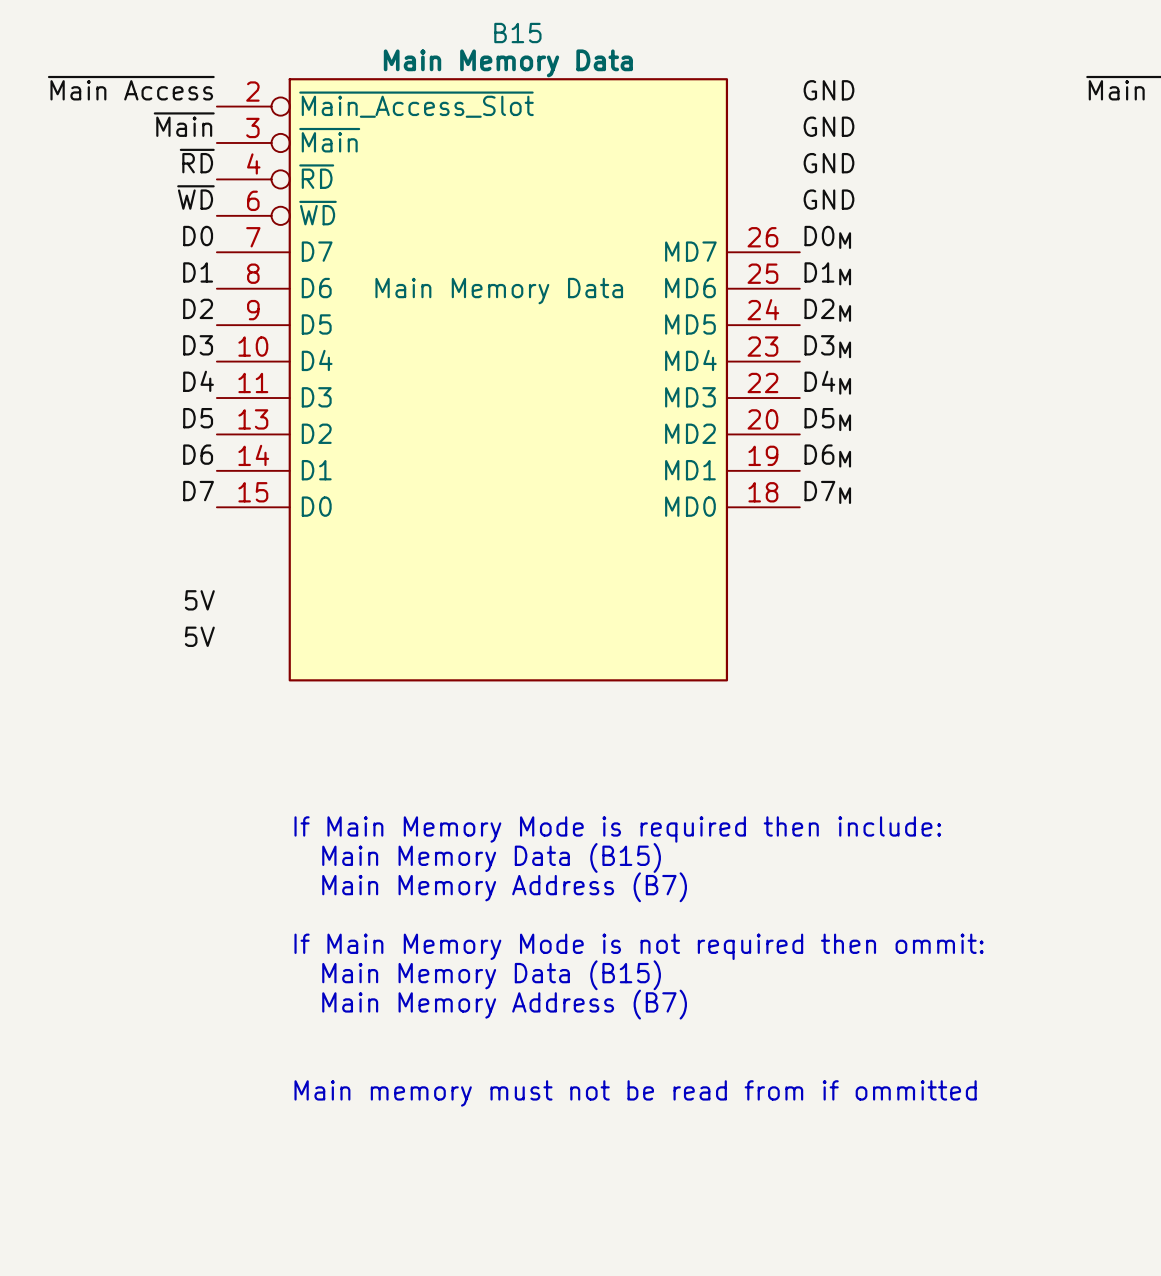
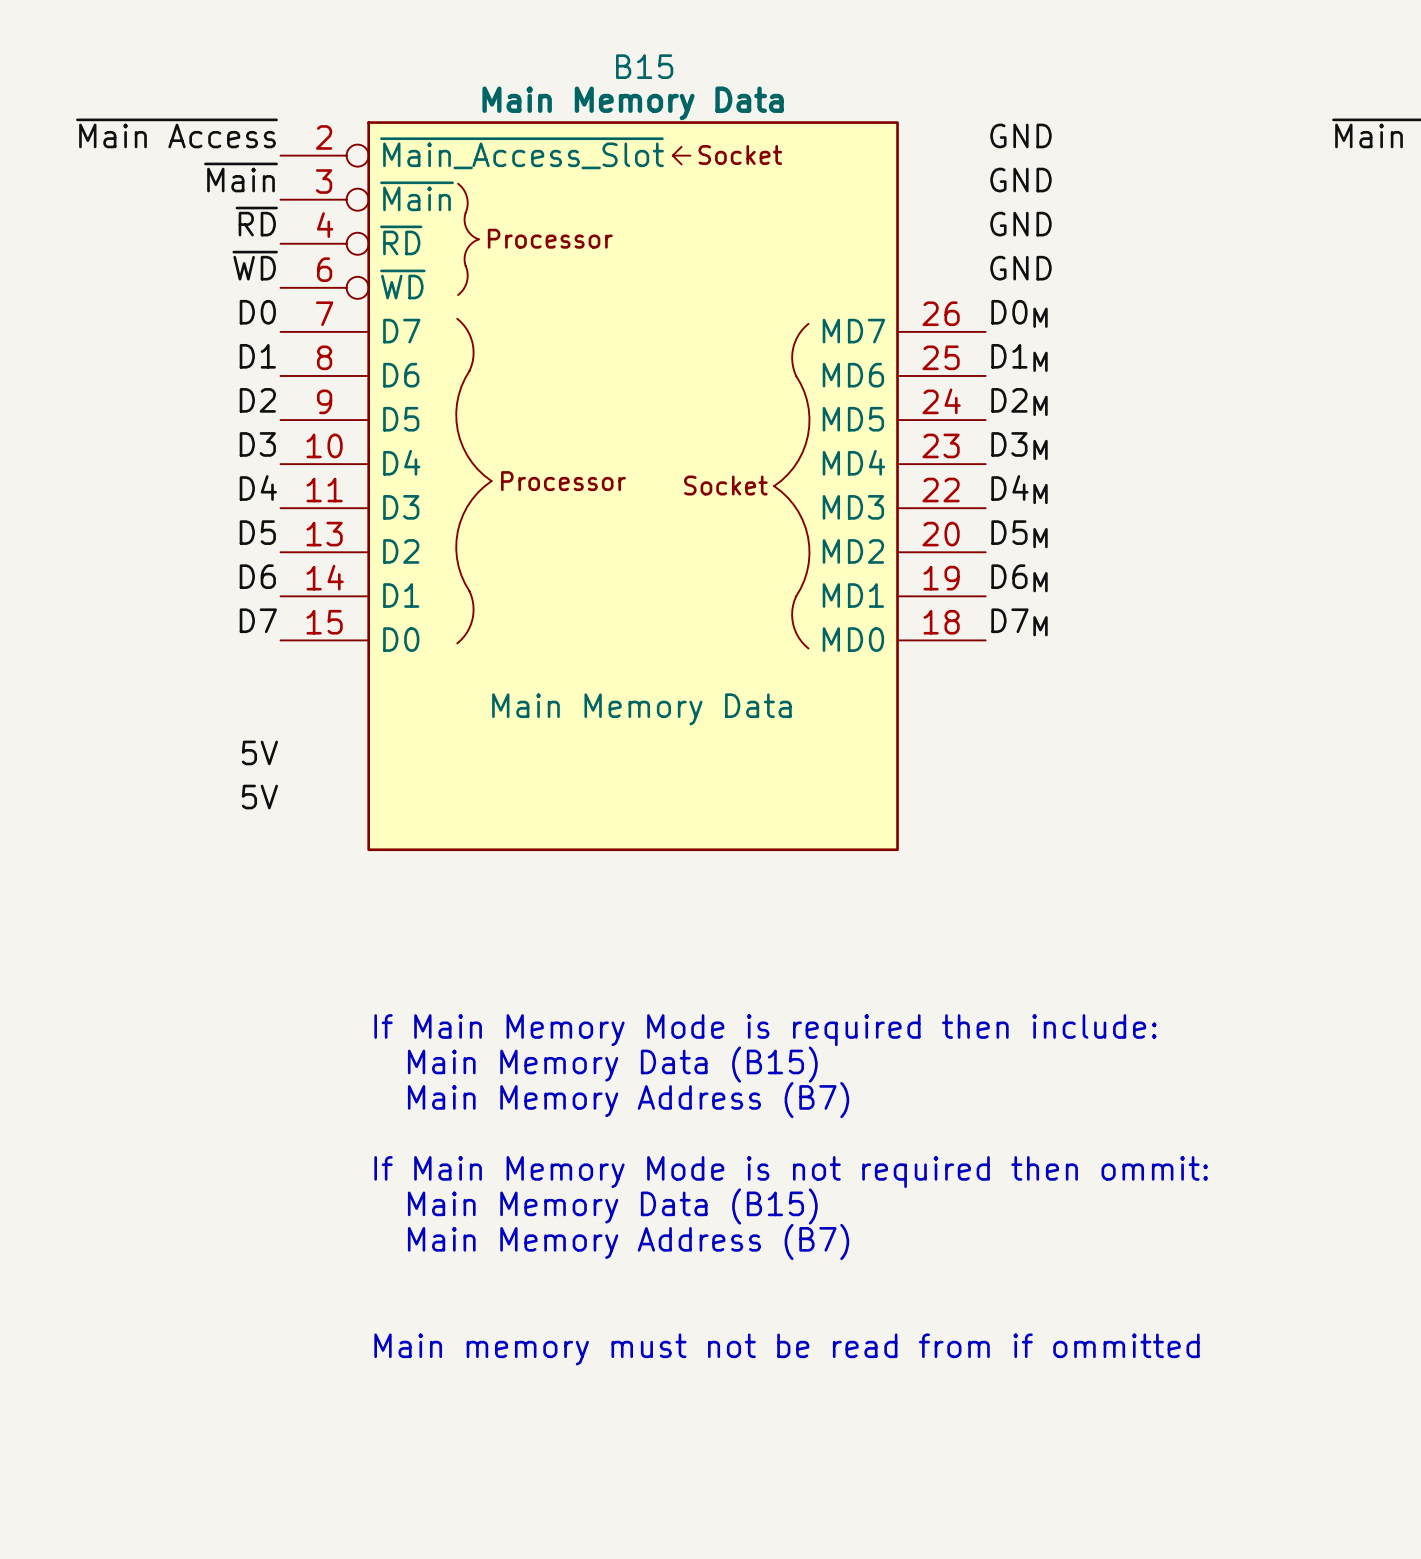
B15 symbol: [216, 78, 800, 682] -> [280, 121, 986, 852]
B15 text position: Main Memory Data (499, 291) -> Main Memory Data (641, 709)

